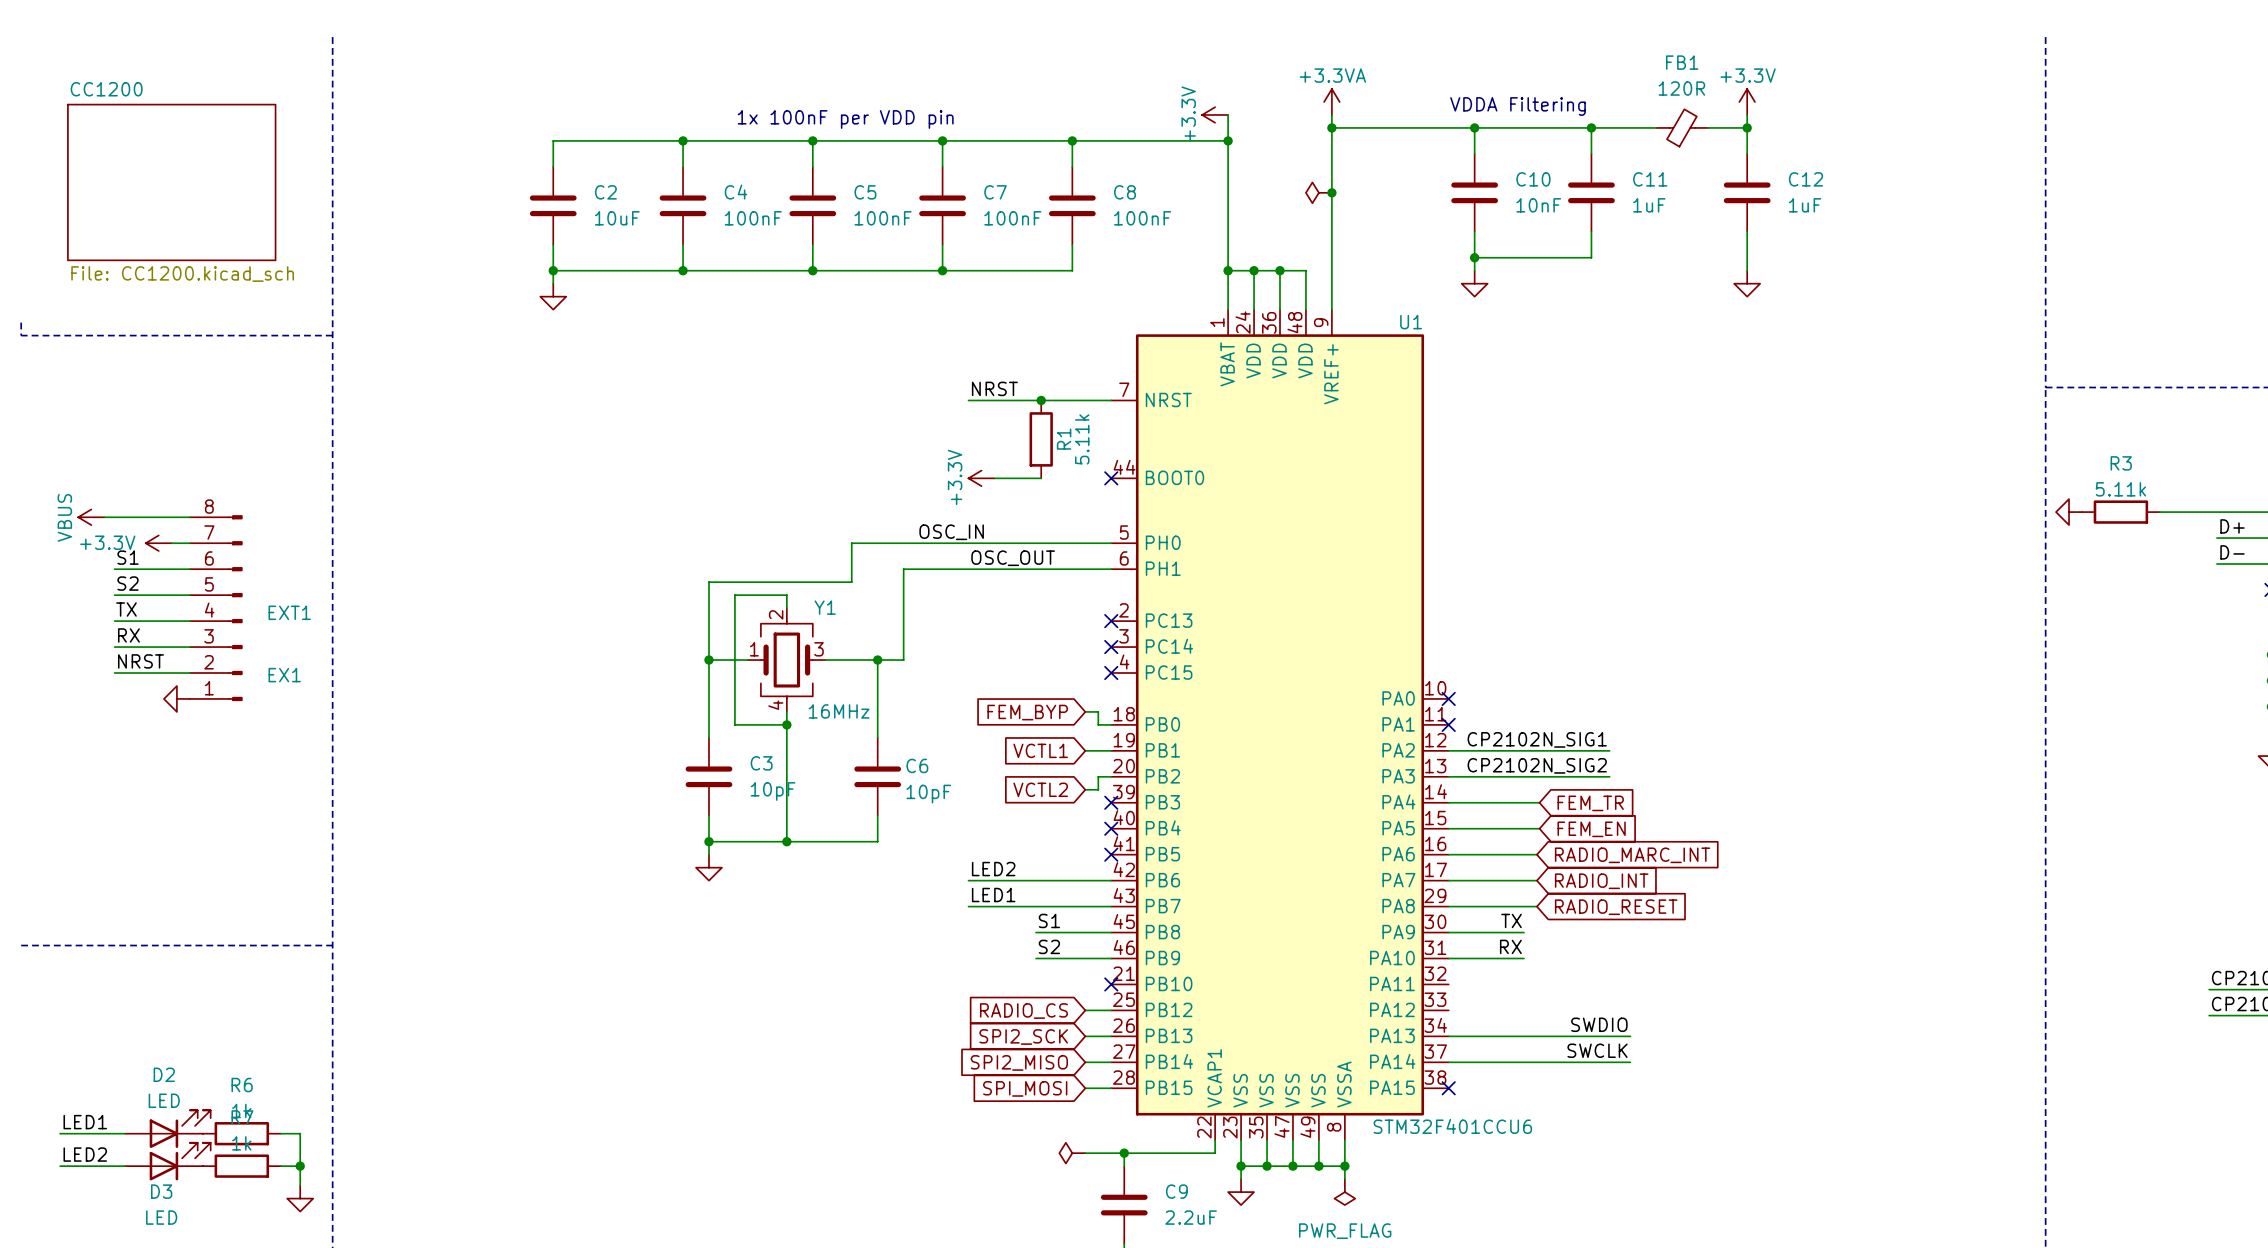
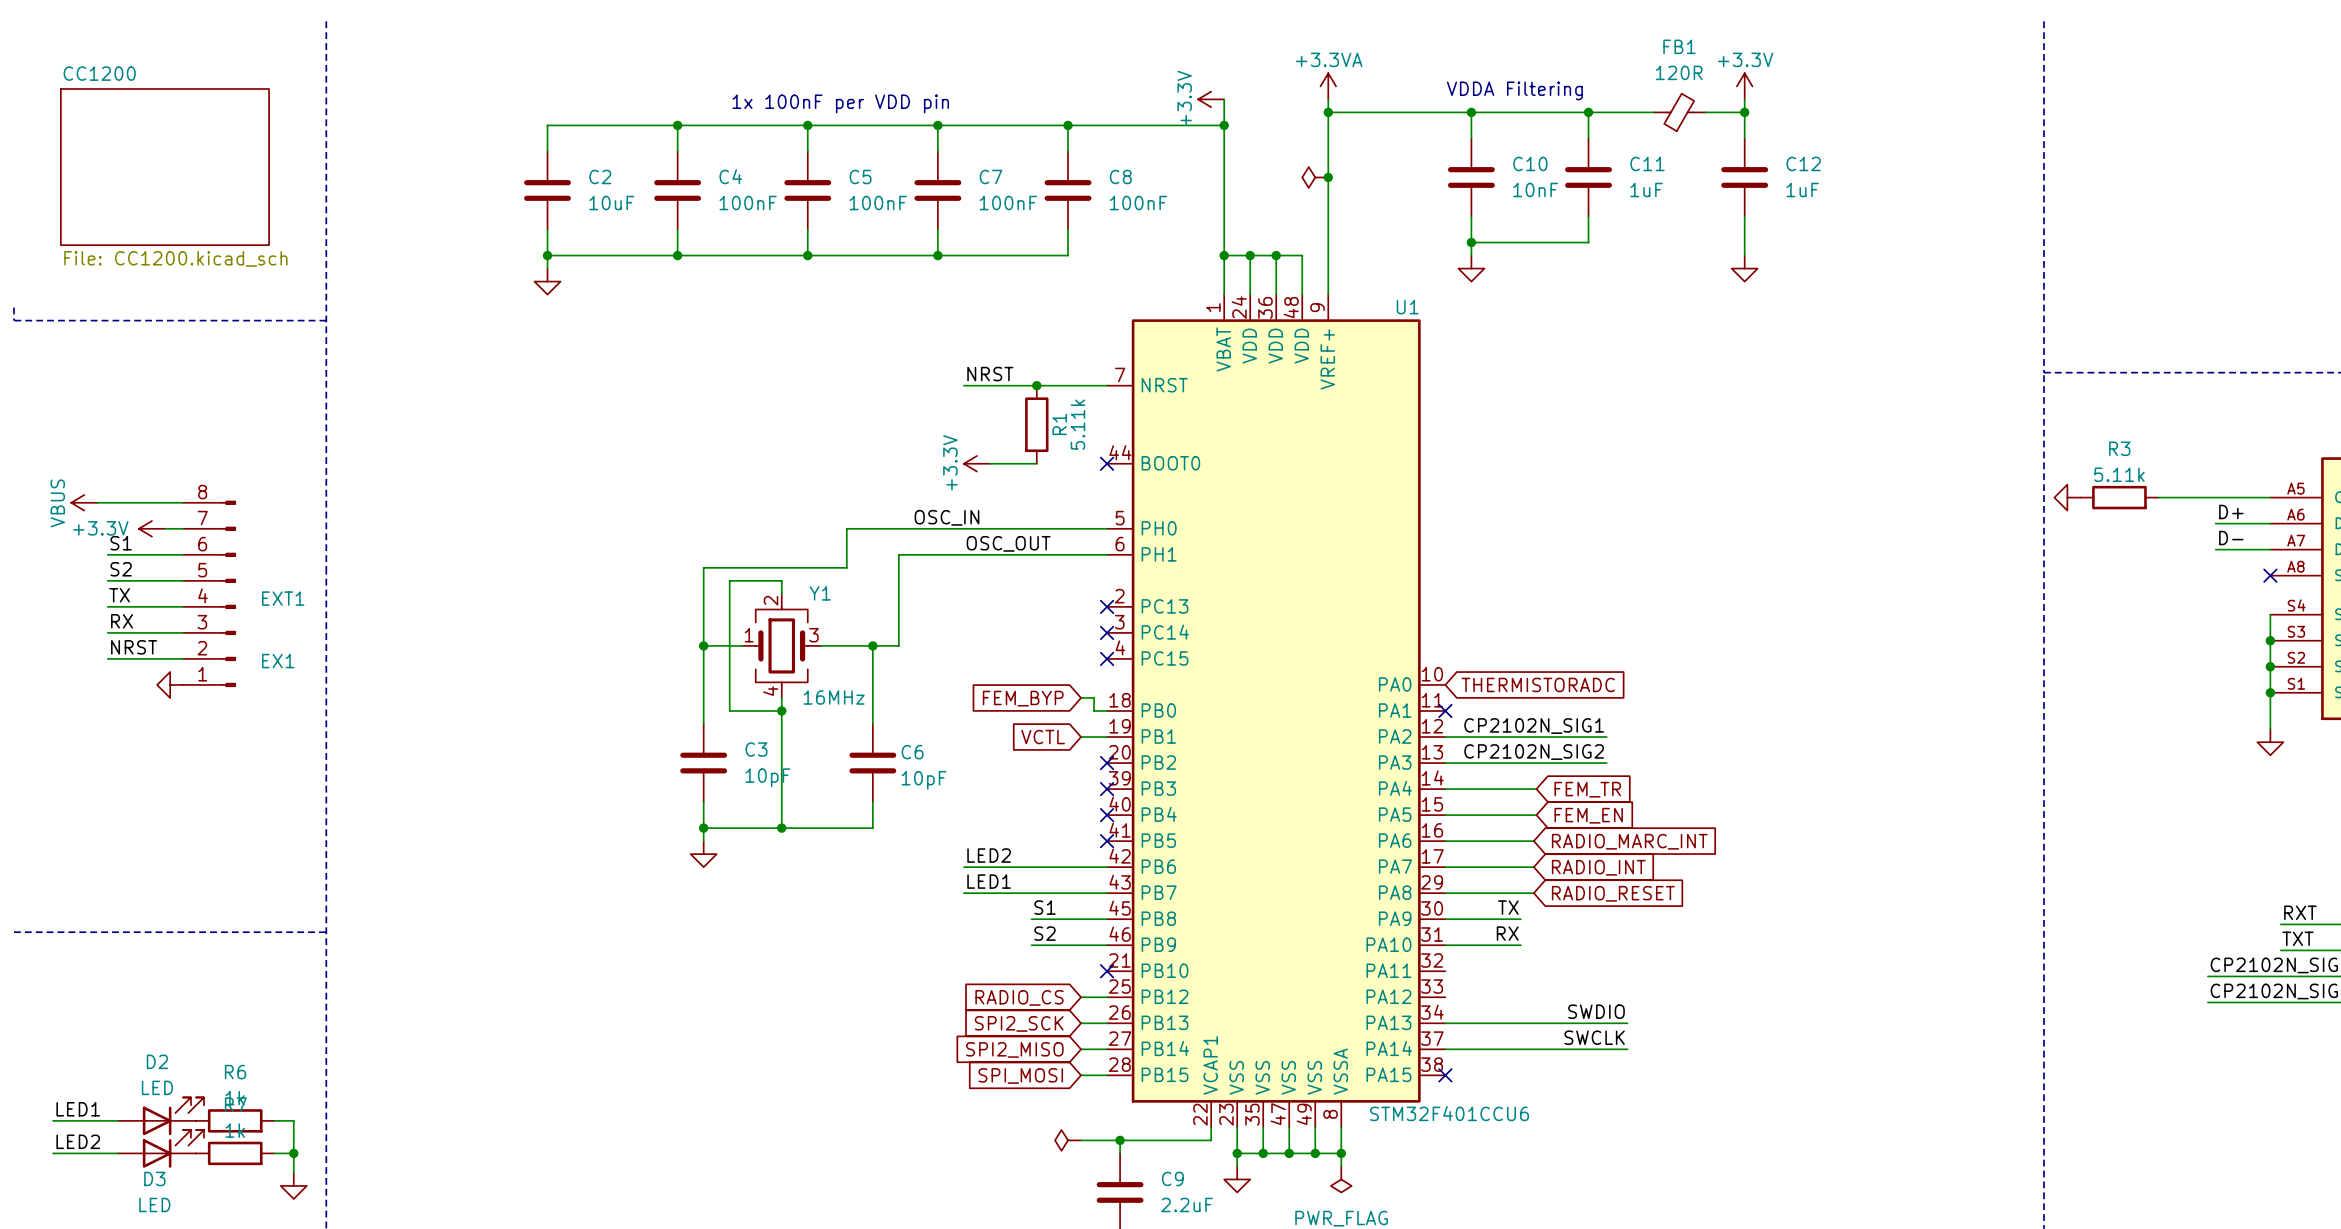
no-connect mark: (1448, 698) -> none
global label: none -> THERMISTORADC (1538, 684)
global label: VCTL1 (1040, 750) -> VCTL (1043, 737)
wire: (1111, 776) (1098, 776) (1098, 789) (1085, 789) -> none
no-connect mark: none -> (1107, 763)
global label: VCTL2 (1040, 789) -> none

